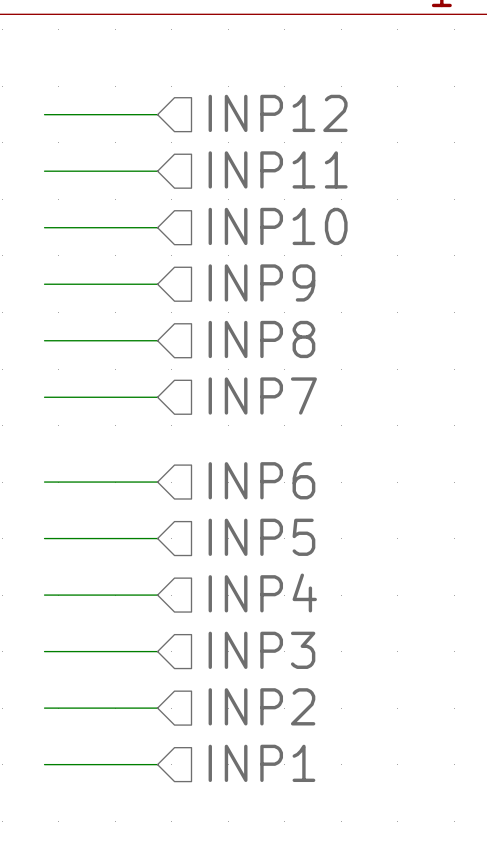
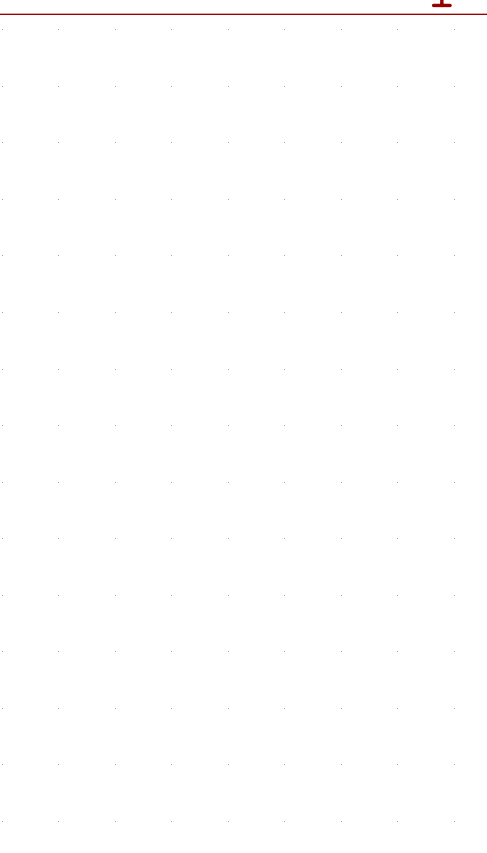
hierarchical label: INP12 (278, 113) -> none
wire: (44, 114) (157, 114) -> none
hierarchical label: INP11 (278, 169) -> none
wire: (44, 171) (157, 171) -> none
hierarchical label: INP10 (278, 226) -> none
wire: (44, 227) (157, 227) -> none
hierarchical label: INP9 (261, 282) -> none
wire: (44, 284) (157, 284) -> none
hierarchical label: INP8 (261, 339) -> none
wire: (44, 340) (157, 340) -> none
hierarchical label: INP7 (262, 395) -> none
wire: (44, 397) (157, 397) -> none
hierarchical label: INP6 (261, 480) -> none
wire: (44, 482) (157, 482) -> none
hierarchical label: INP5 (261, 537) -> none
wire: (44, 538) (157, 538) -> none
hierarchical label: INP4 (262, 593) -> none
wire: (44, 595) (157, 595) -> none
hierarchical label: INP3 (261, 650) -> none
wire: (44, 651) (157, 651) -> none
hierarchical label: INP2 (261, 706) -> none
wire: (44, 708) (157, 708) -> none
hierarchical label: INP1 (261, 763) -> none
wire: (44, 764) (157, 764) -> none

